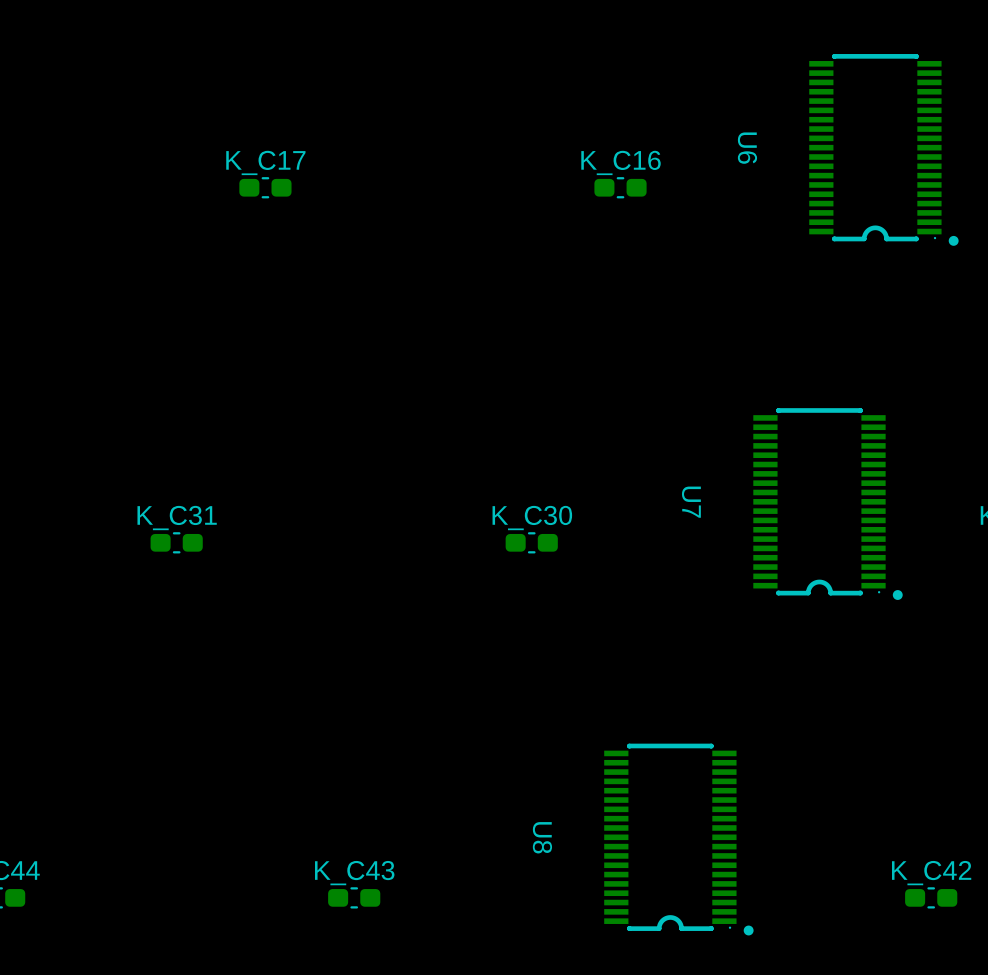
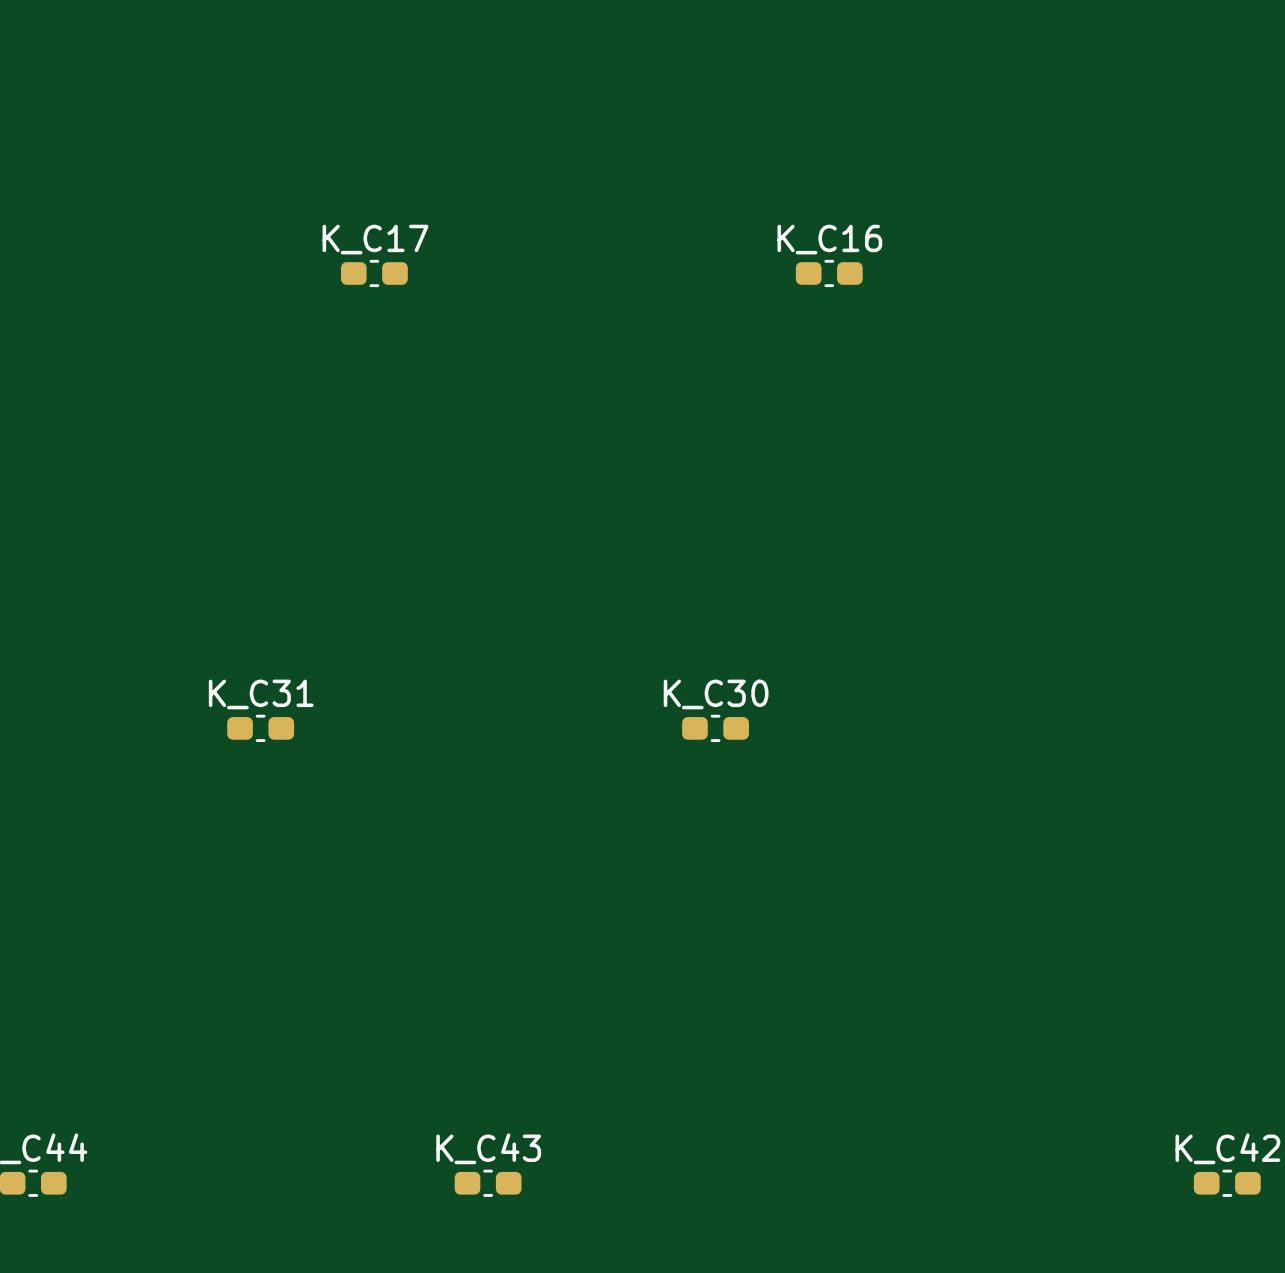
U6: (883, 149) -> none
U7: (828, 504) -> none
U8: (678, 839) -> none

